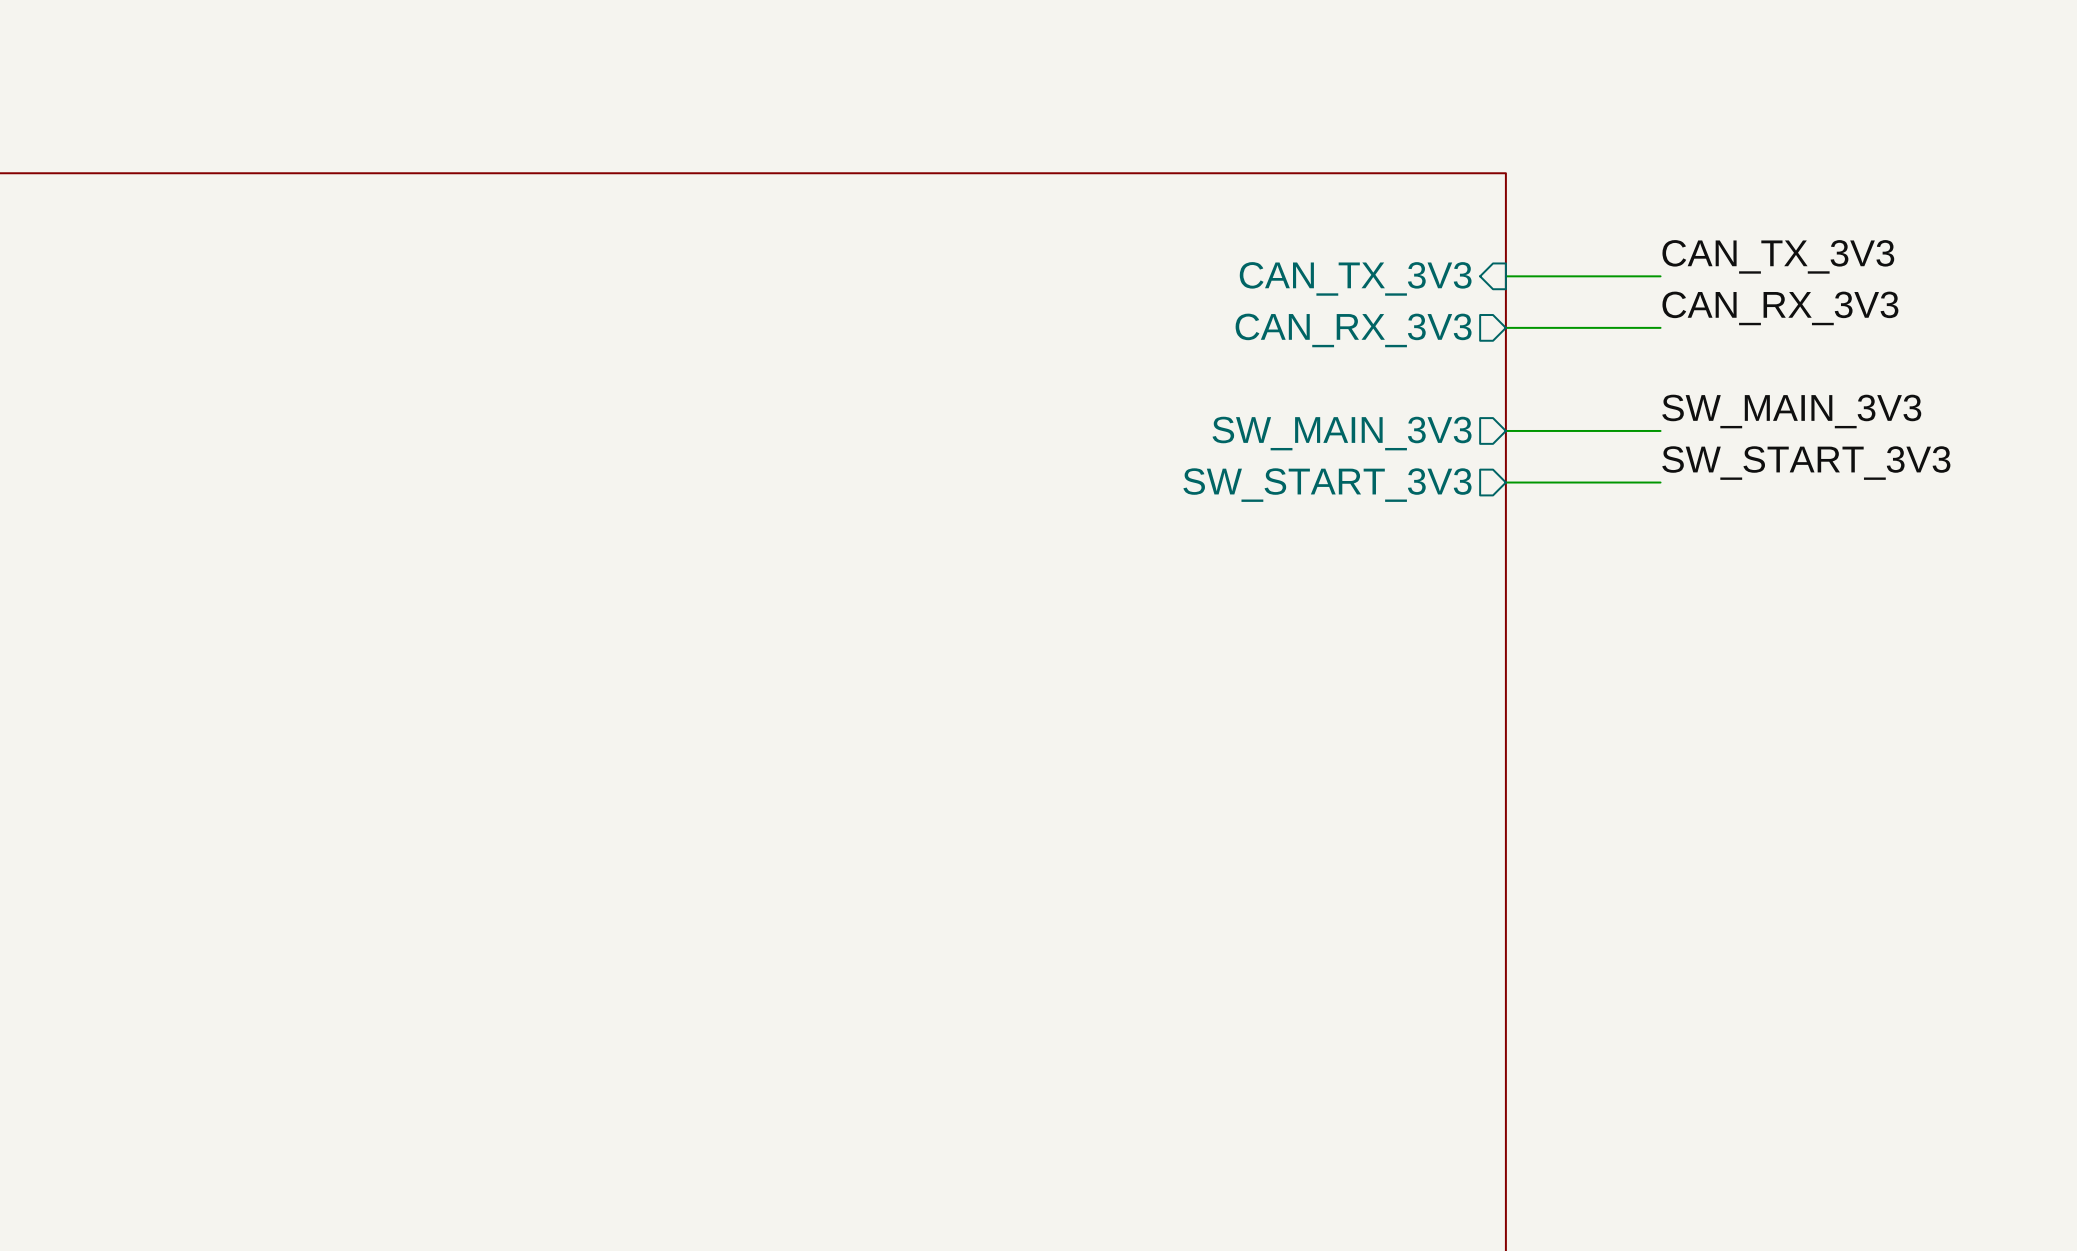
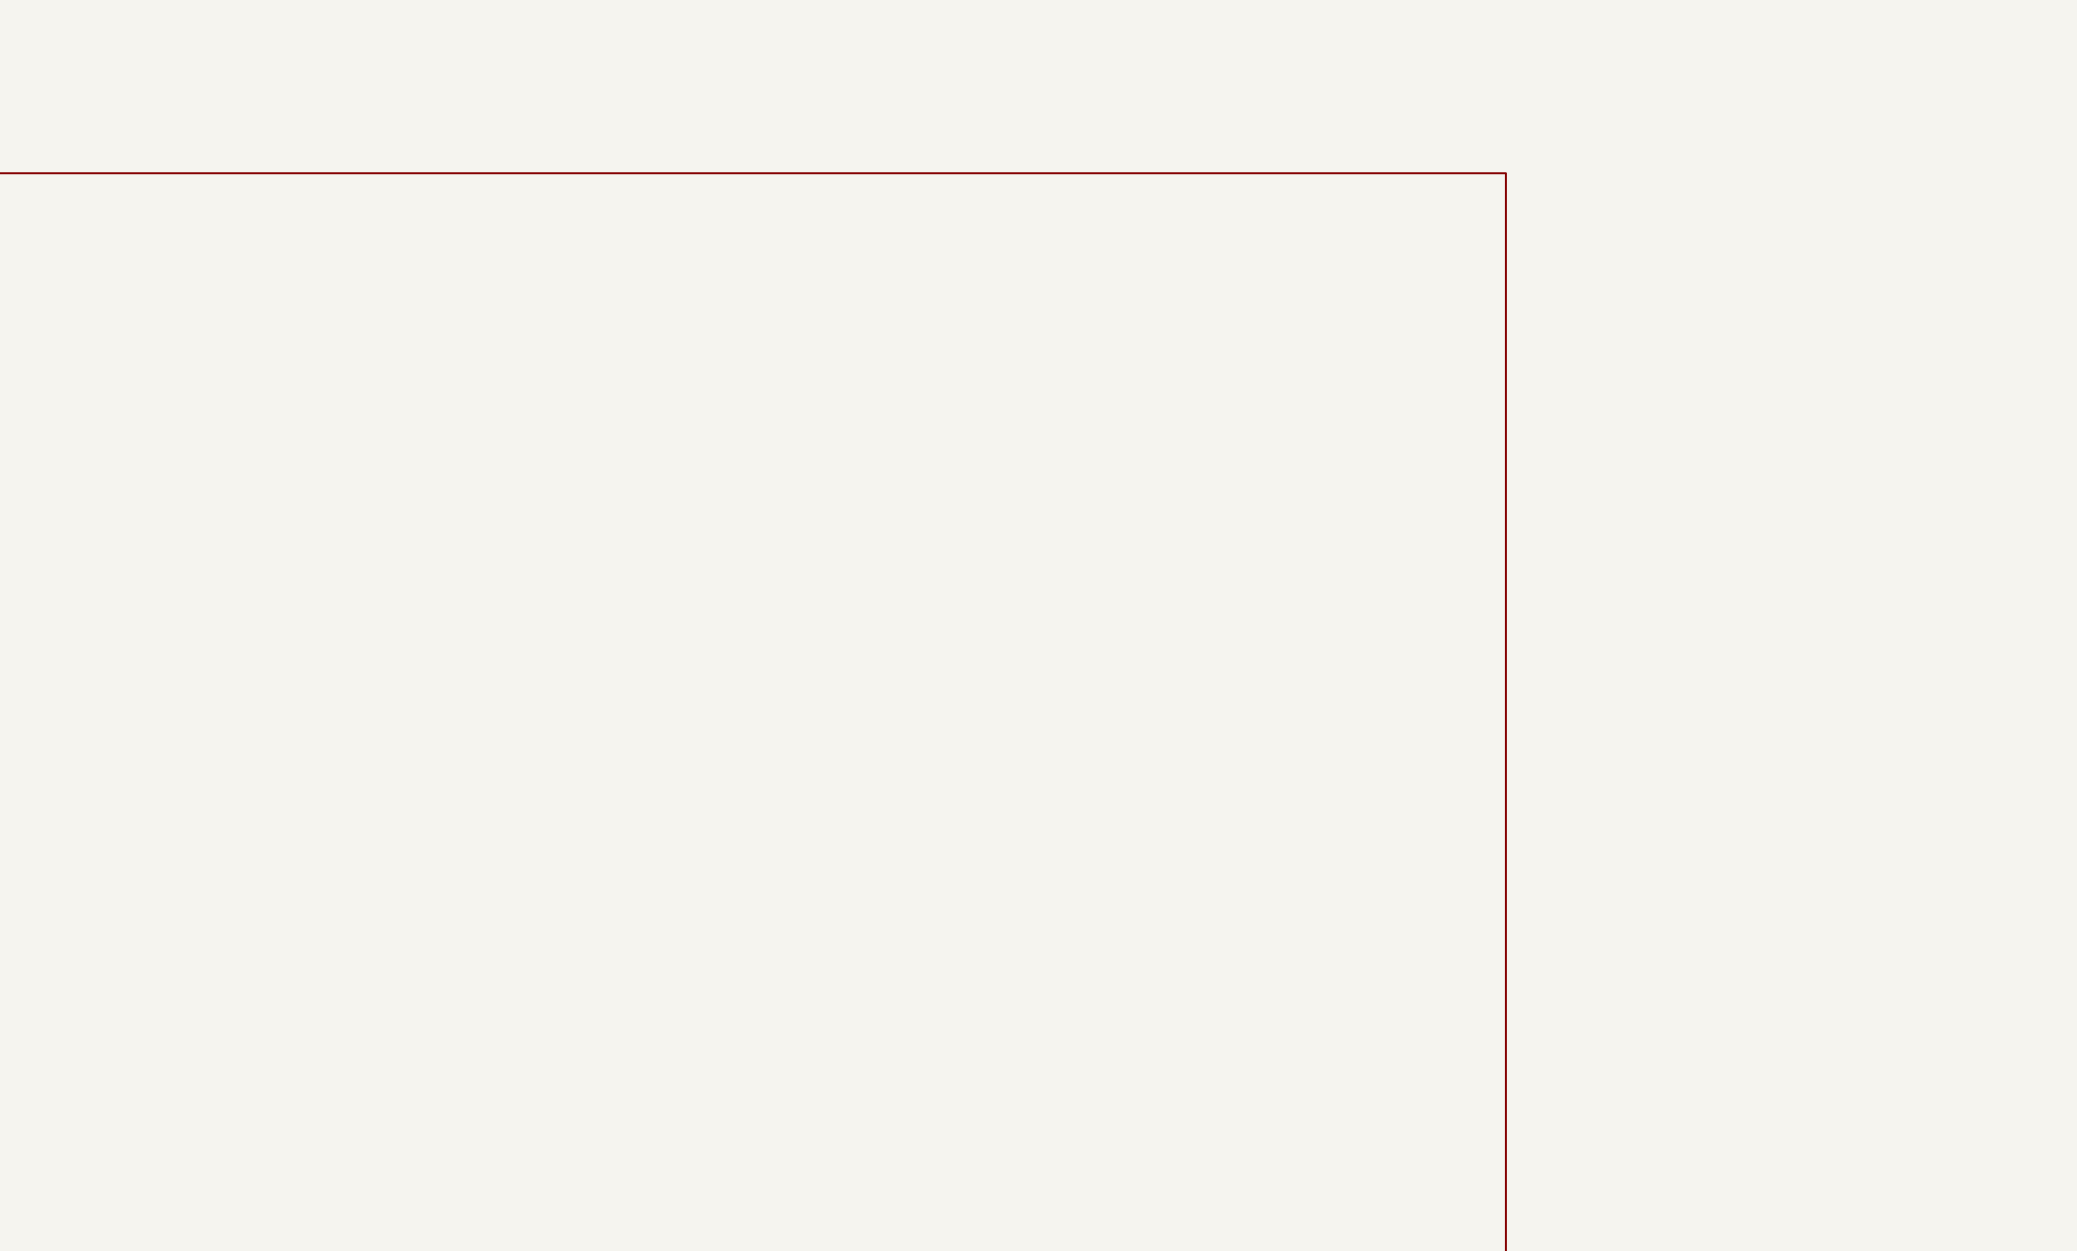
label: CAN_TX_3V3 (1778, 256) -> none
wire: (1505, 276) (1660, 276) -> none
sheet pin: CAN_TX_3V3 (1355, 278) -> none
label: CAN_RX_3V3 (1780, 308) -> none
wire: (1505, 327) (1660, 327) -> none
sheet pin: CAN_RX_3V3 (1353, 330) -> none
label: SW_MAIN_3V3 (1791, 411) -> none
wire: (1505, 430) (1660, 430) -> none
sheet pin: SW_MAIN_3V3 (1342, 433) -> none
label: SW_START_3V3 (1806, 463) -> none
wire: (1505, 482) (1660, 482) -> none
sheet pin: SW_START_3V3 (1327, 485) -> none

